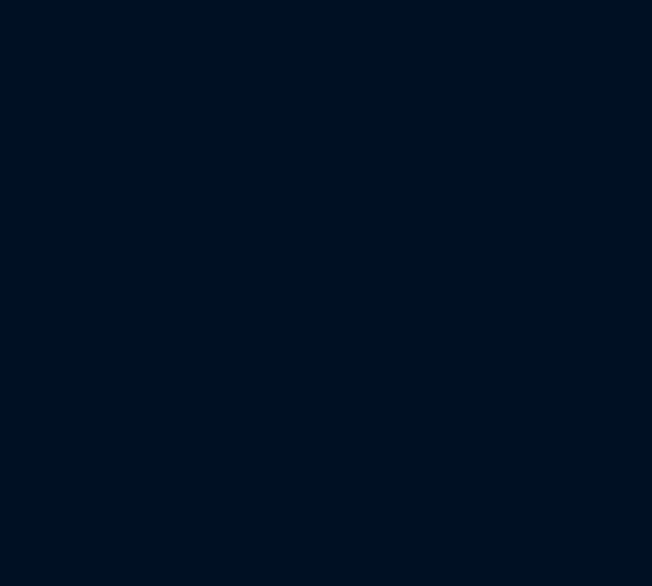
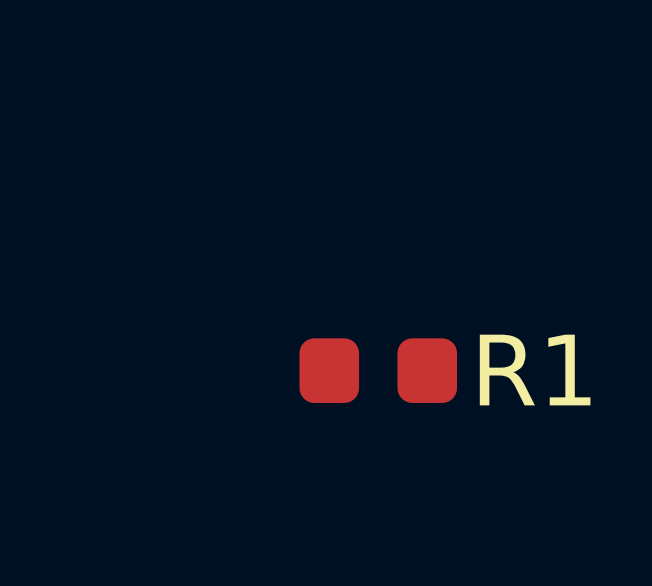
R1: none -> (378, 370)

